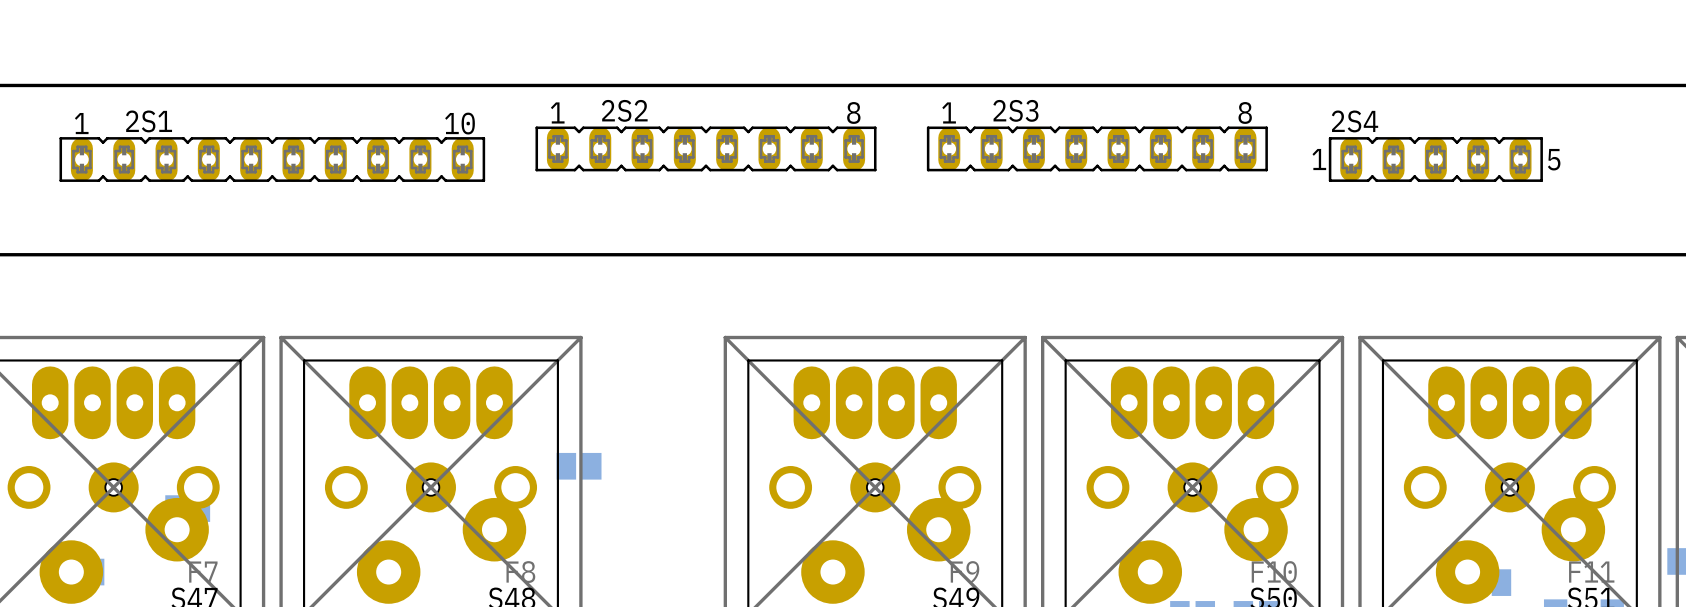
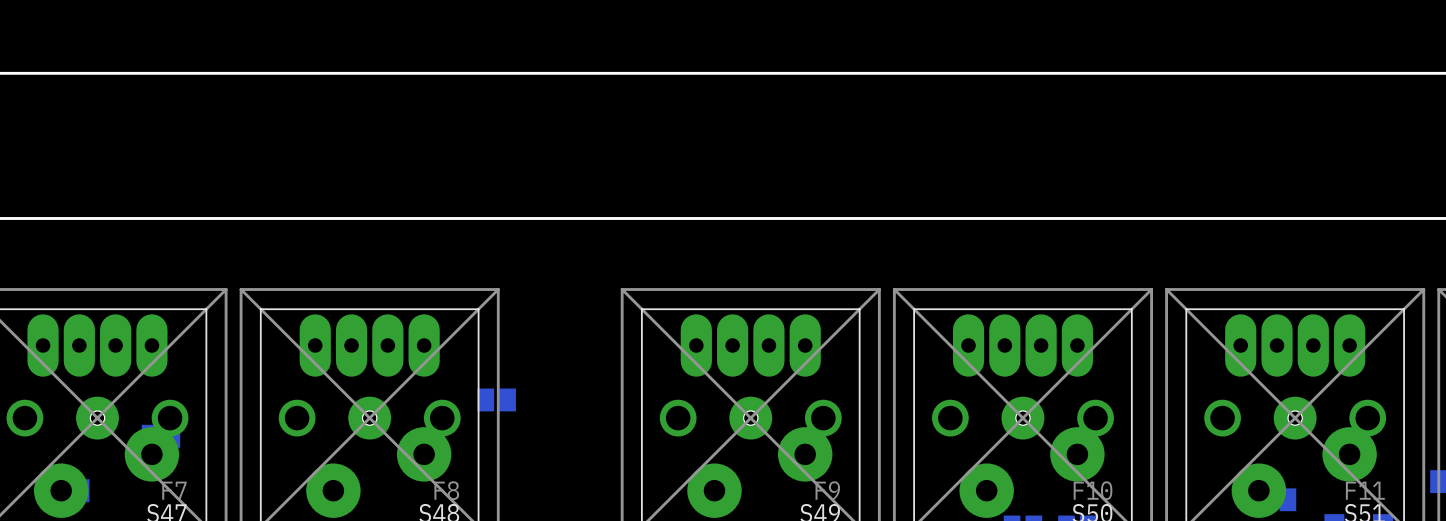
2S2: (706, 148) -> none
2S3: (1097, 148) -> none
2S1: (272, 159) -> none
2S4: (1435, 159) -> none

